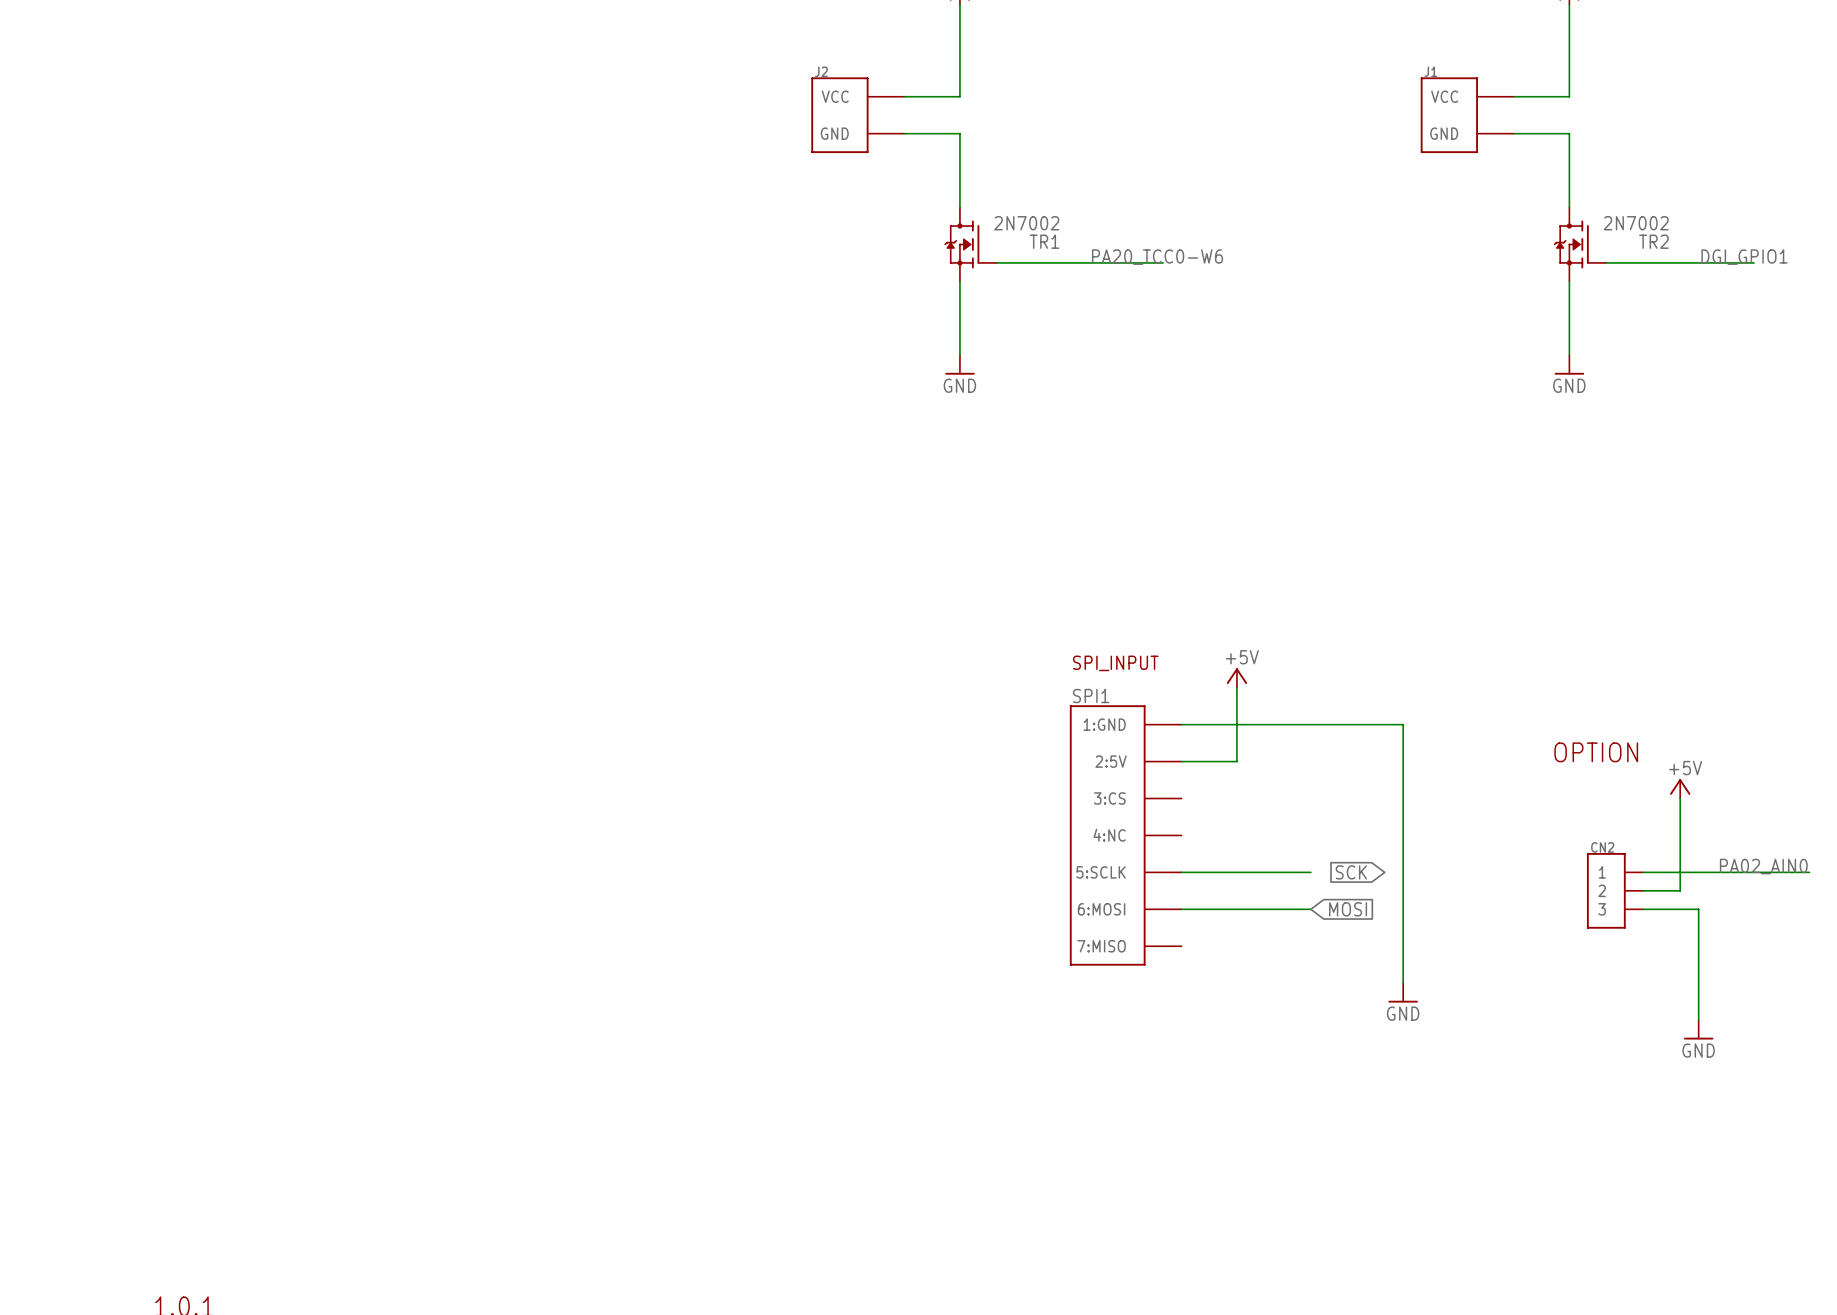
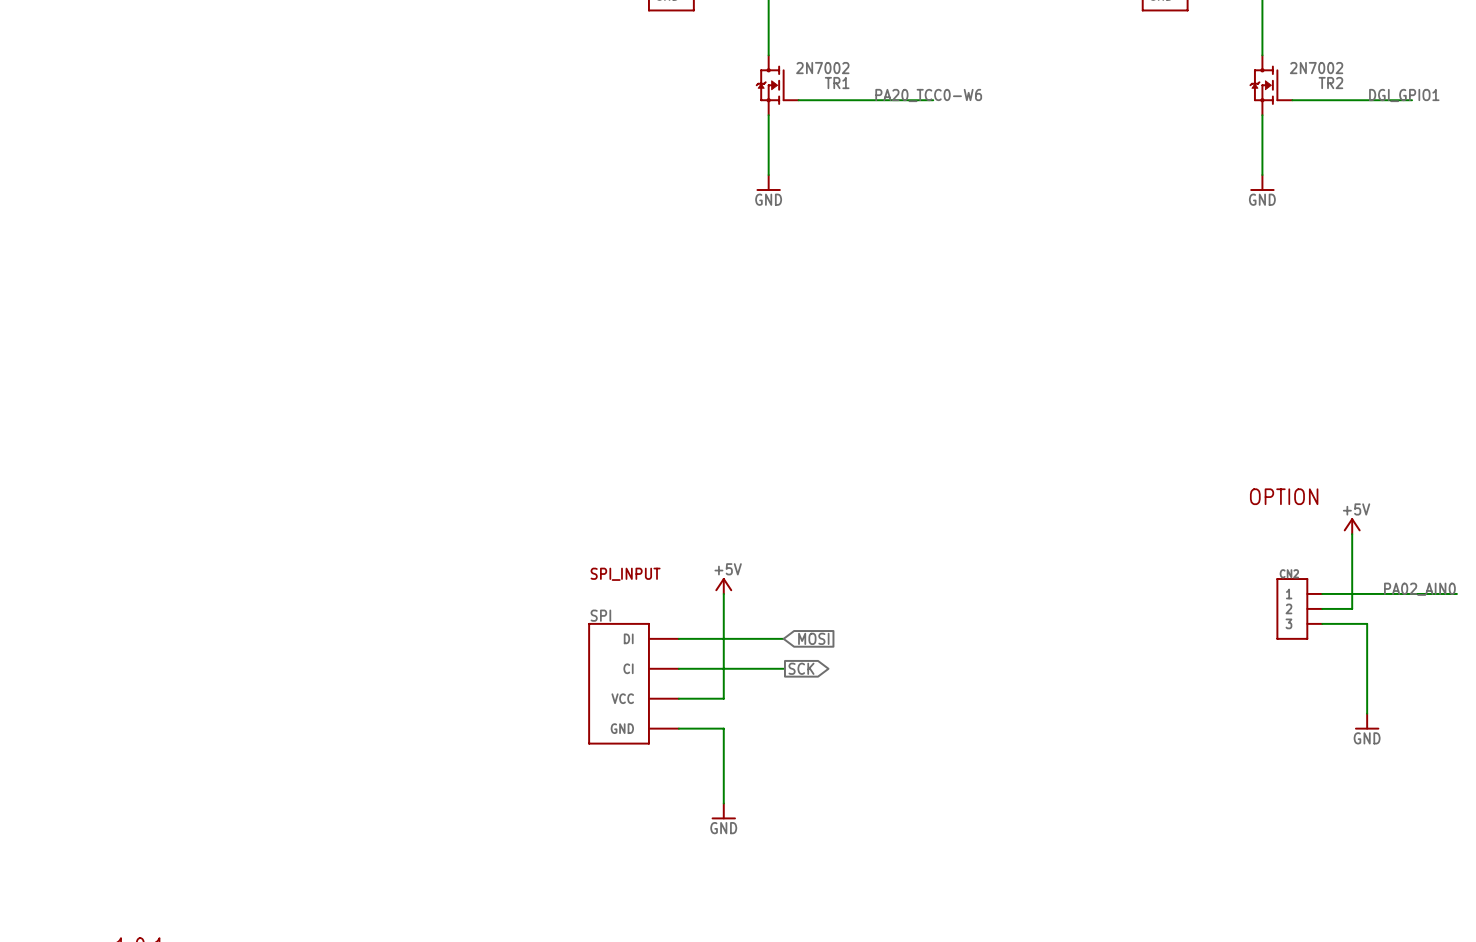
text: SPI_INPUT (1115, 663) -> none
power symbol: +5V (1236, 678) -> none
wire: (1236, 687) (1236, 761) (1181, 761) -> none
wire: (1181, 724) (1403, 724) (1403, 983) -> none
SPI1: (1125, 835) -> none
text: none -> SPI_INPUT (625, 574)
power symbol: none -> +5V (723, 586)
wire: none -> (723, 593) (723, 698) (678, 698)
wire: (1181, 872) (1310, 872) -> none
global label: SCK (1351, 872) -> none
wire: (1181, 909) (1310, 909) -> none
global label: MOSI (1348, 909) -> none
wire: none -> (678, 638) (783, 638)
global label: none -> MOSI (813, 638)
wire: none -> (678, 668) (783, 668)
global label: none -> SCK (801, 668)
SPI: none -> (633, 683)
power symbol: GND (1403, 992) -> none
wire: none -> (678, 728) (723, 728) (723, 803)
power symbol: none -> GND (723, 811)

